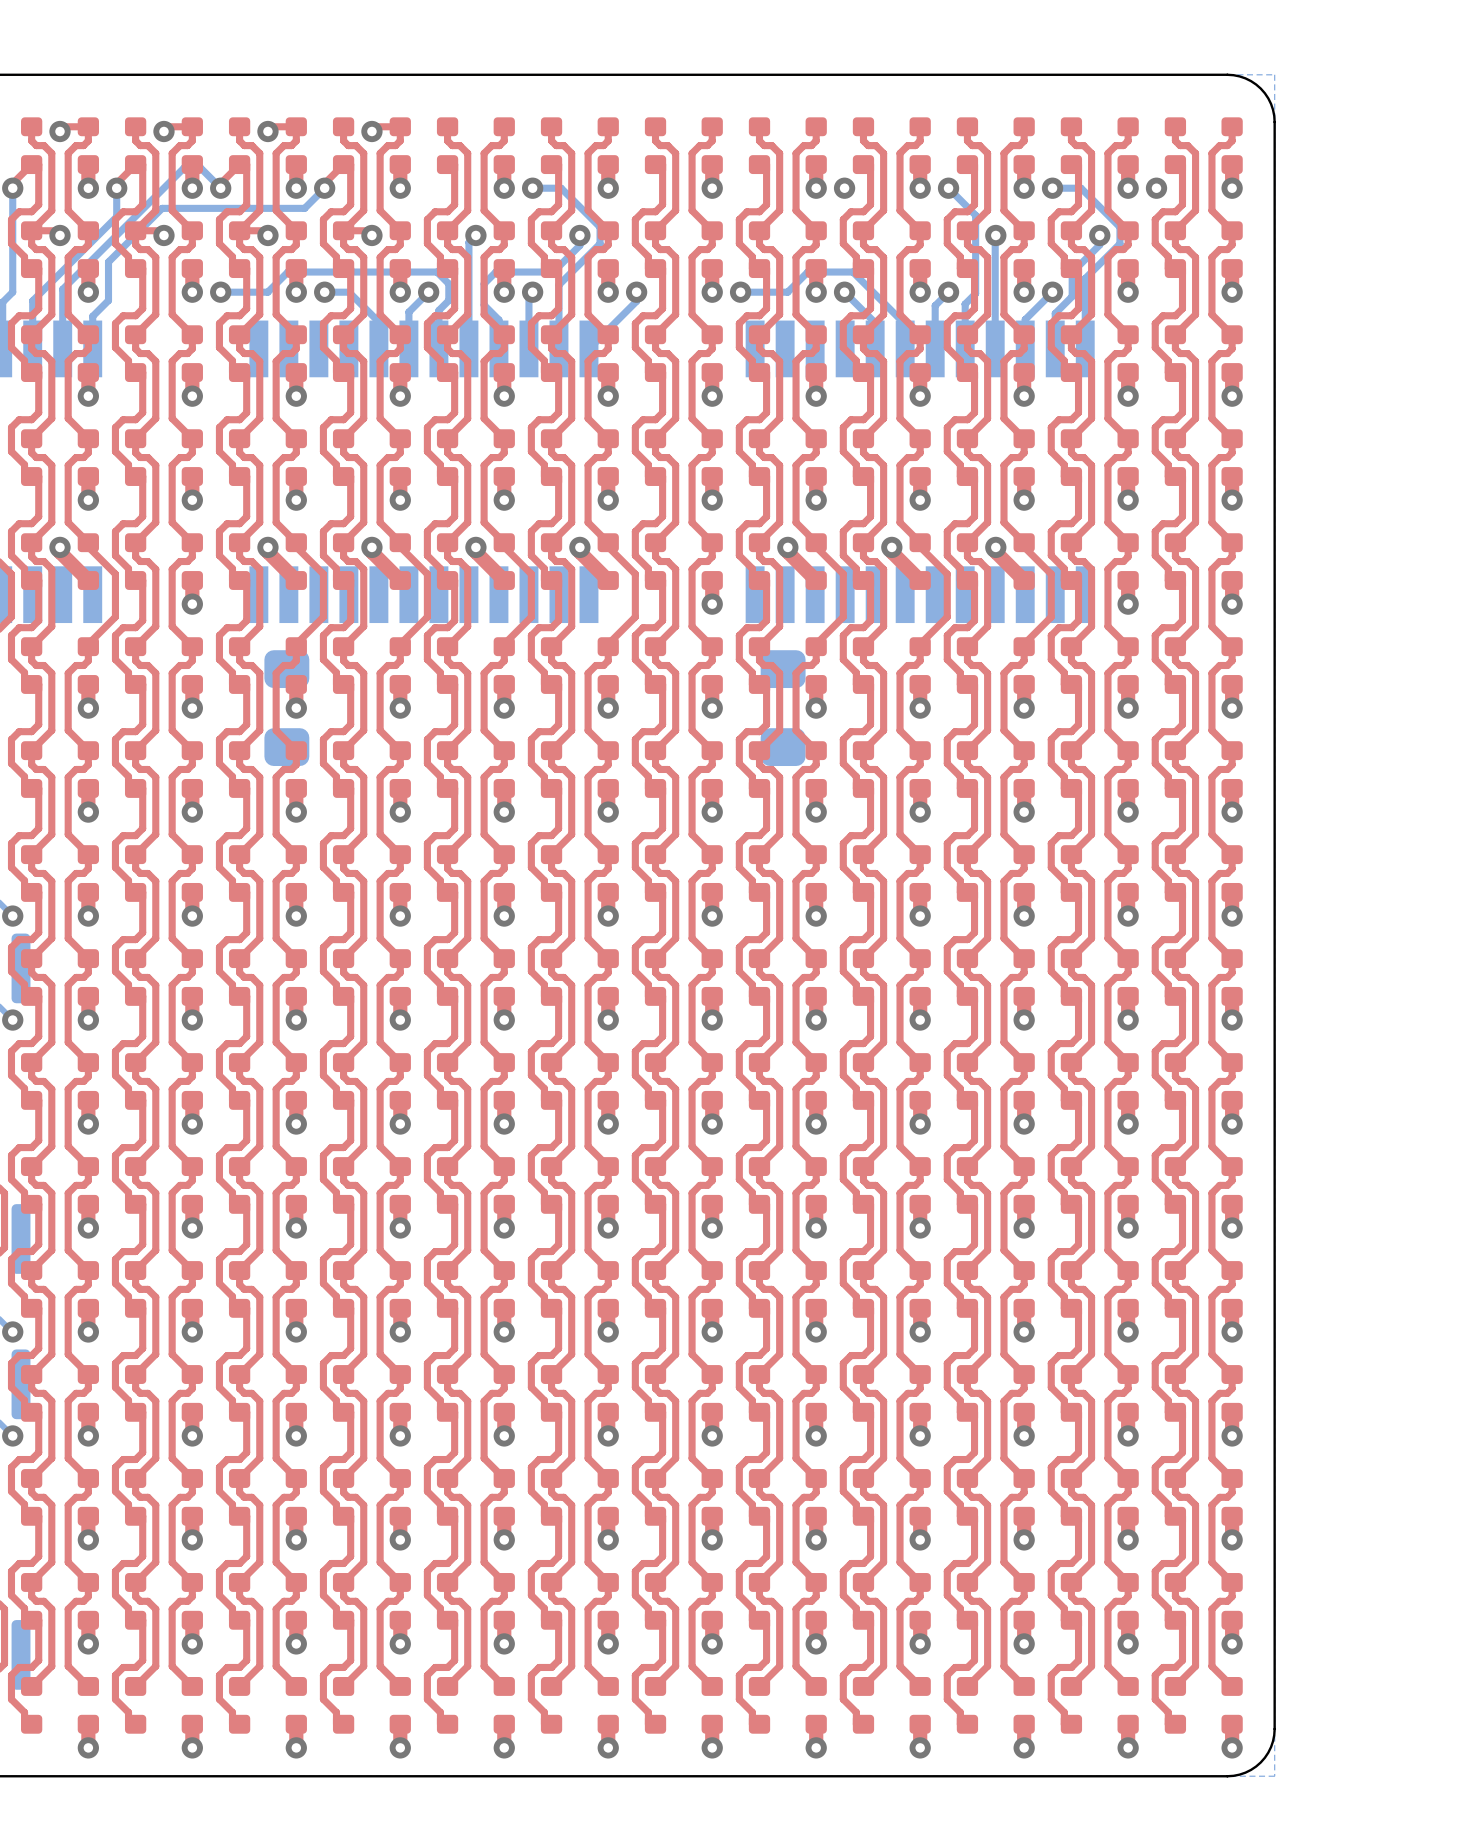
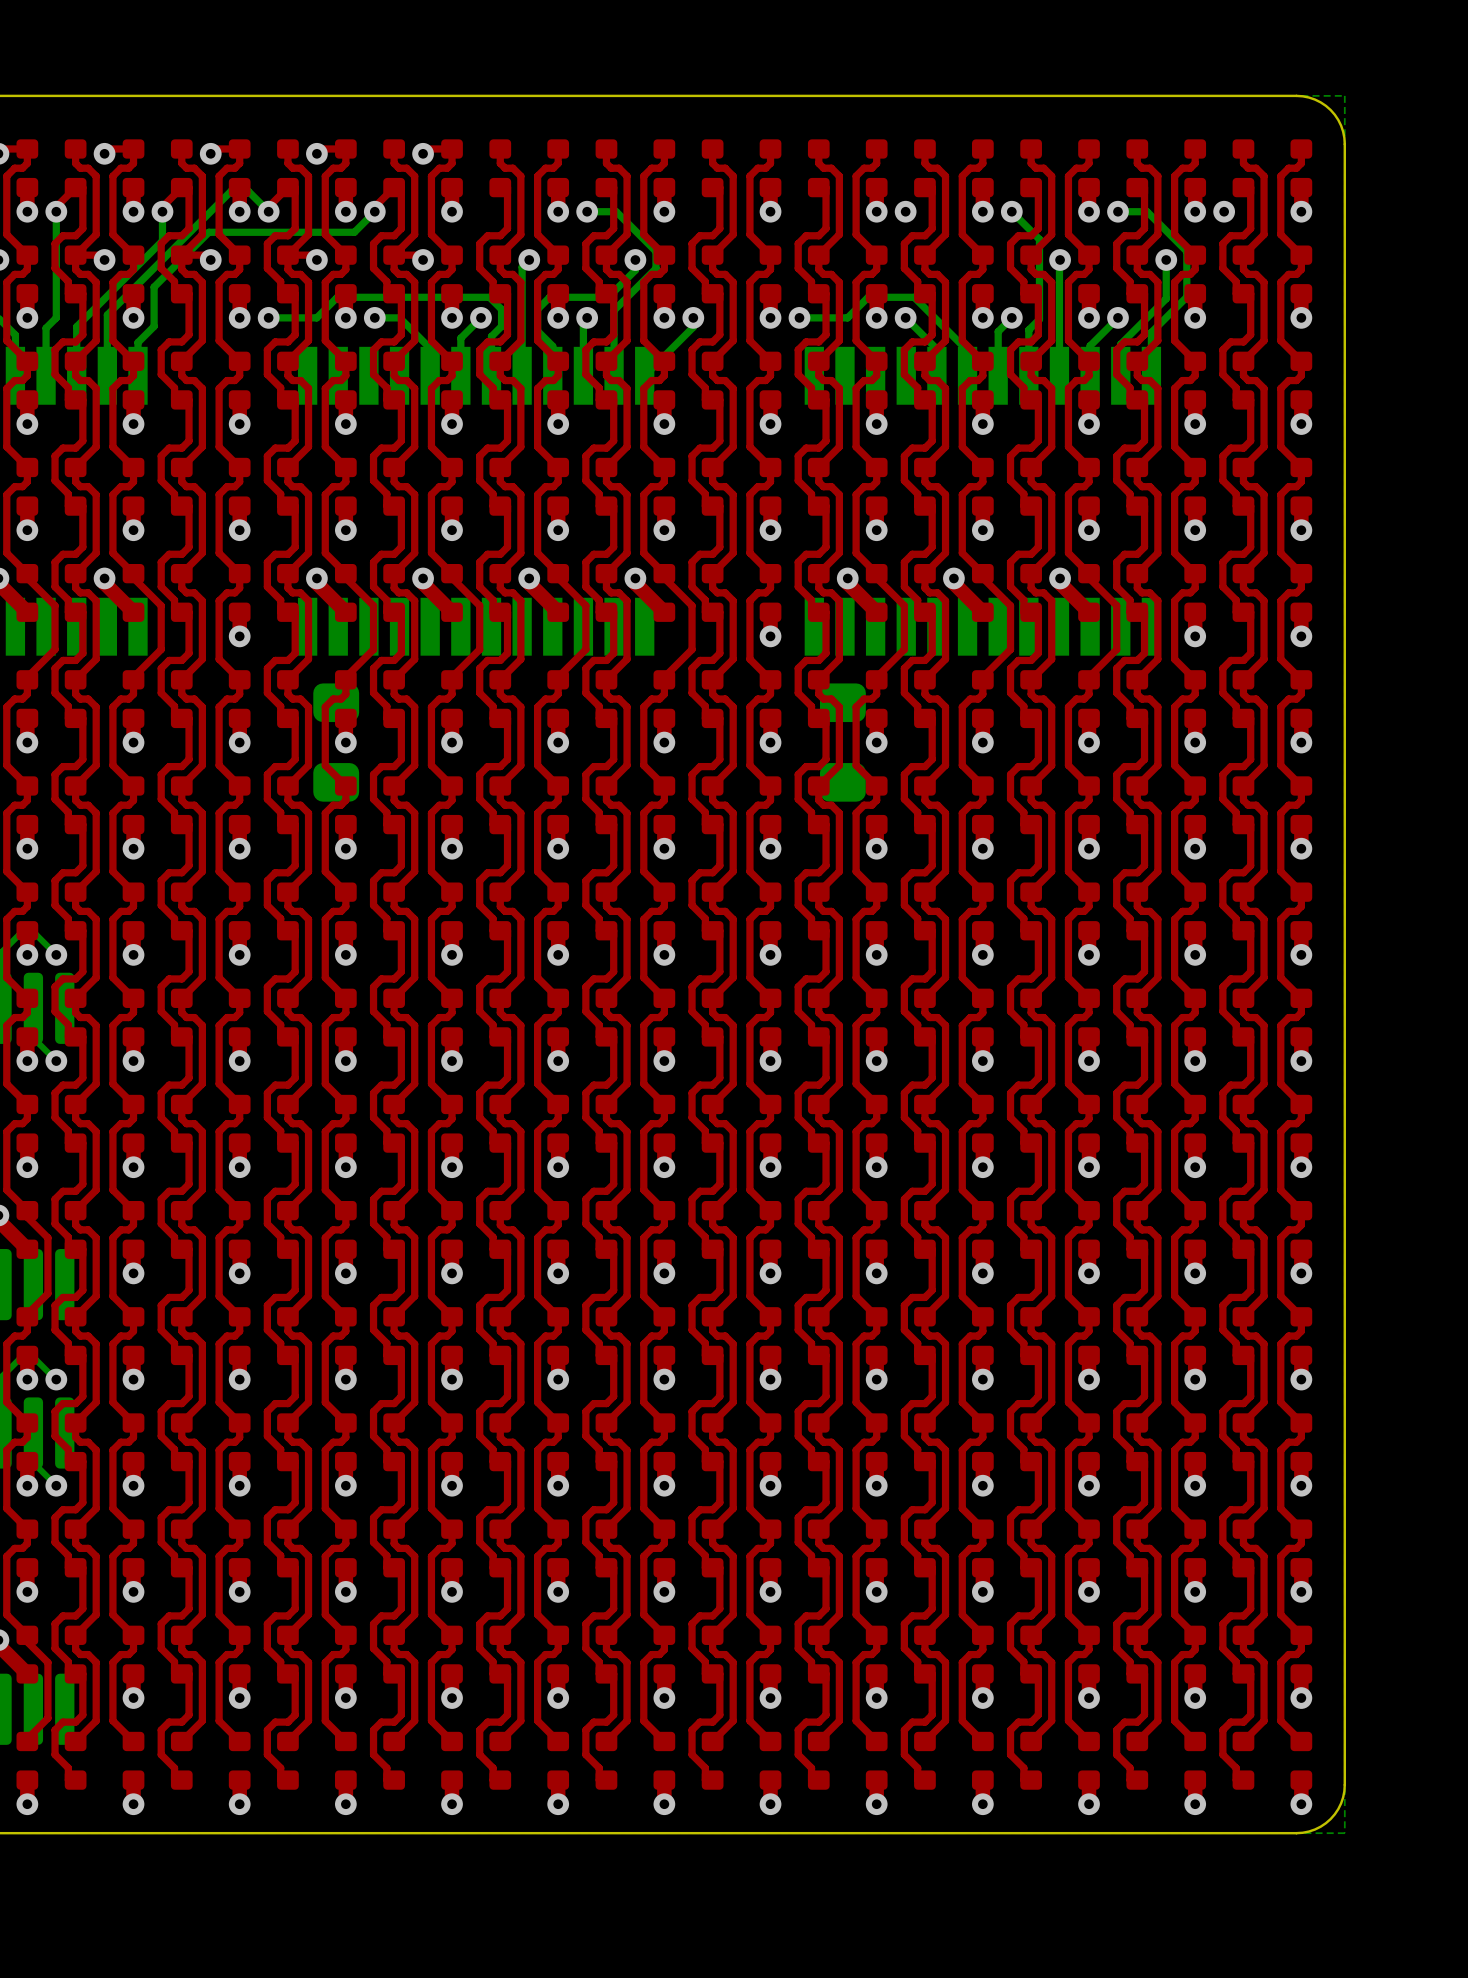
bottom track: (1119, 243) (1085, 278) (1085, 306) -> (1186, 268) (1186, 297) (1151, 332)
bottom track: (1099, 244) (1072, 272) (1072, 296) (1055, 313) (1055, 317) -> (1166, 269) (1166, 298) (1120, 344)

